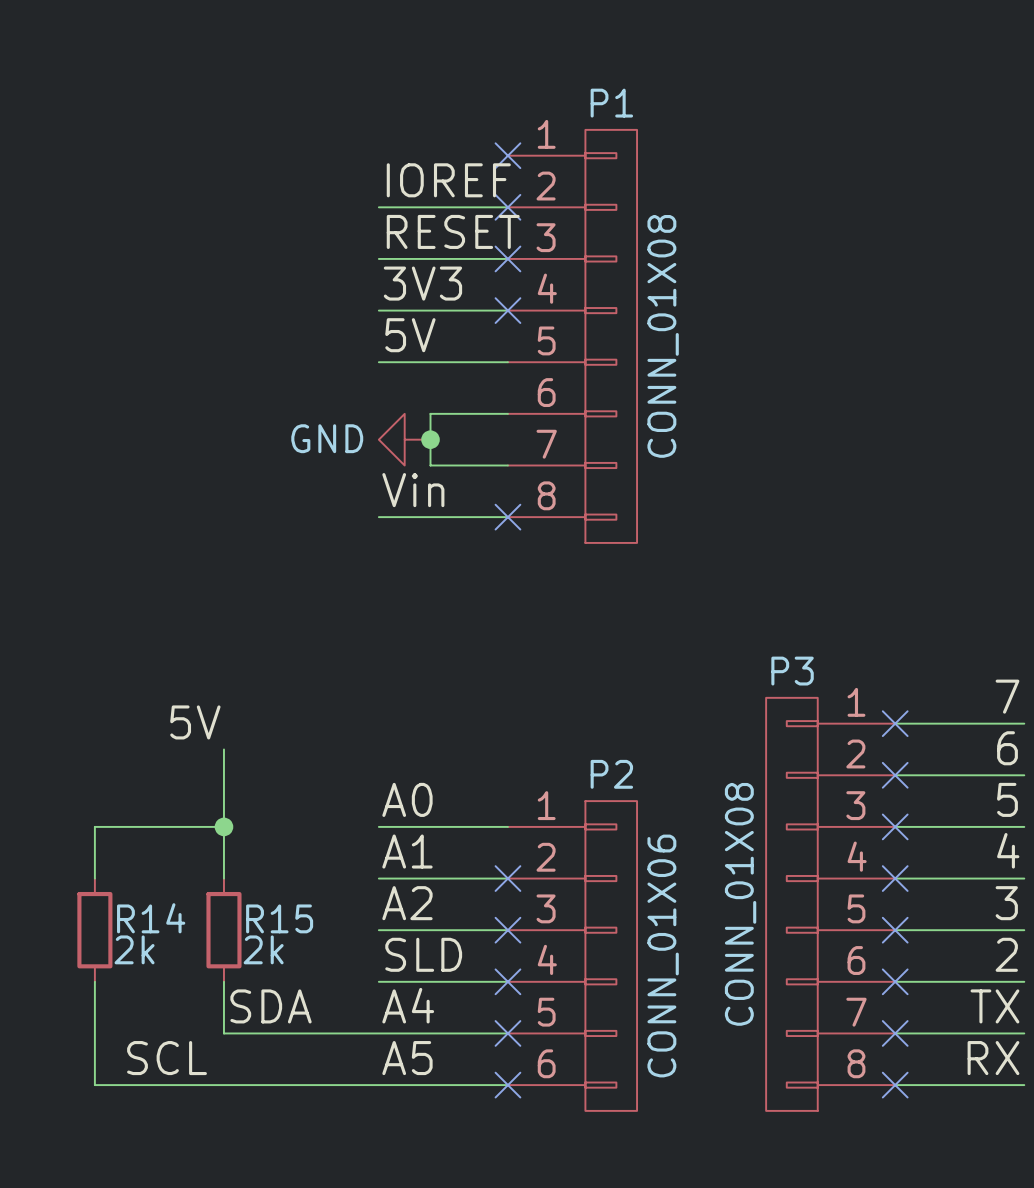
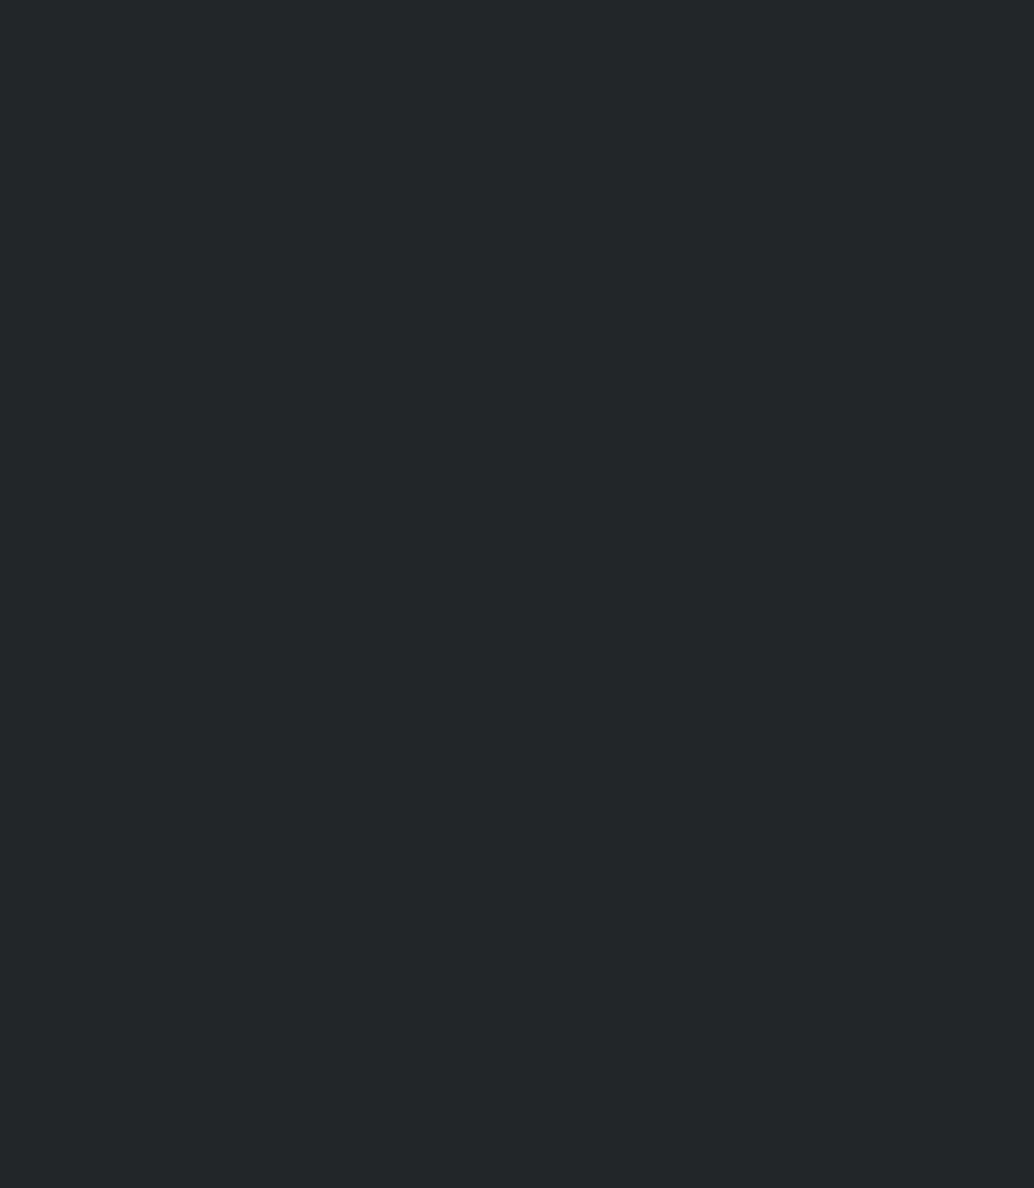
no-connect mark: (507, 155) -> none
label: IOREF (448, 180) -> none
wire: (378, 207) (507, 207) -> none
no-connect mark: (507, 207) -> none
label: RESET (453, 231) -> none
wire: (378, 258) (507, 258) -> none
no-connect mark: (507, 258) -> none
label: 3V3 (422, 283) -> none
wire: (378, 310) (507, 310) -> none
no-connect mark: (507, 310) -> none
label: 5V (410, 335) -> none
P1: CONN_01X08 (572, 336) -> none
wire: (378, 362) (507, 362) -> none
wire: (507, 413) (430, 413) (430, 465) (507, 465) -> none
power symbol: GND (404, 439) -> none
junction: (430, 439) -> none
label: Vin (413, 490) -> none
wire: (378, 517) (507, 517) -> none
no-connect mark: (507, 517) -> none
label: 7 (1007, 696) -> none
label: 5V (195, 722) -> none
wire: (895, 723) (1024, 723) -> none
no-connect mark: (895, 723) -> none
label: 6 (1007, 748) -> none
wire: (223, 749) (223, 878) -> none
wire: (895, 775) (1024, 775) -> none
no-connect mark: (895, 775) -> none
label: A0 (407, 799) -> none
label: 5 (1007, 799) -> none
wire: (223, 826) (94, 826) (94, 878) -> none
junction: (223, 826) -> none
wire: (378, 826) (507, 826) -> none
wire: (895, 826) (1024, 826) -> none
no-connect mark: (895, 826) -> none
label: 4 (1008, 850) -> none
label: A1 (407, 851) -> none
wire: (378, 878) (507, 878) -> none
no-connect mark: (507, 878) -> none
wire: (895, 878) (1024, 878) -> none
no-connect mark: (895, 878) -> none
label: A2 (407, 903) -> none
label: 3 (1006, 903) -> none
P3: CONN_01X08 (830, 904) -> none
R14: 2k (94, 930) -> none
R15: 2k (223, 930) -> none
wire: (378, 930) (507, 930) -> none
no-connect mark: (507, 930) -> none
wire: (895, 930) (1024, 930) -> none
no-connect mark: (895, 930) -> none
label: SLD (423, 954) -> none
label: 2 (1006, 954) -> none
P2: CONN_01X06 (572, 956) -> none
wire: (94, 981) (94, 1085) (507, 1085) -> none
wire: (223, 981) (223, 1033) (507, 1033) -> none
wire: (378, 981) (507, 981) -> none
no-connect mark: (507, 981) -> none
wire: (895, 981) (1024, 981) -> none
no-connect mark: (895, 981) -> none
label: A4 (408, 1005) -> none
label: SDA (271, 1006) -> none
label: TX (994, 1006) -> none
no-connect mark: (507, 1033) -> none
wire: (895, 1033) (1024, 1033) -> none
no-connect mark: (895, 1033) -> none
label: SCL (167, 1058) -> none
label: A5 (407, 1058) -> none
label: RX (993, 1058) -> none
no-connect mark: (507, 1085) -> none
wire: (895, 1085) (1024, 1085) -> none
no-connect mark: (895, 1085) -> none

